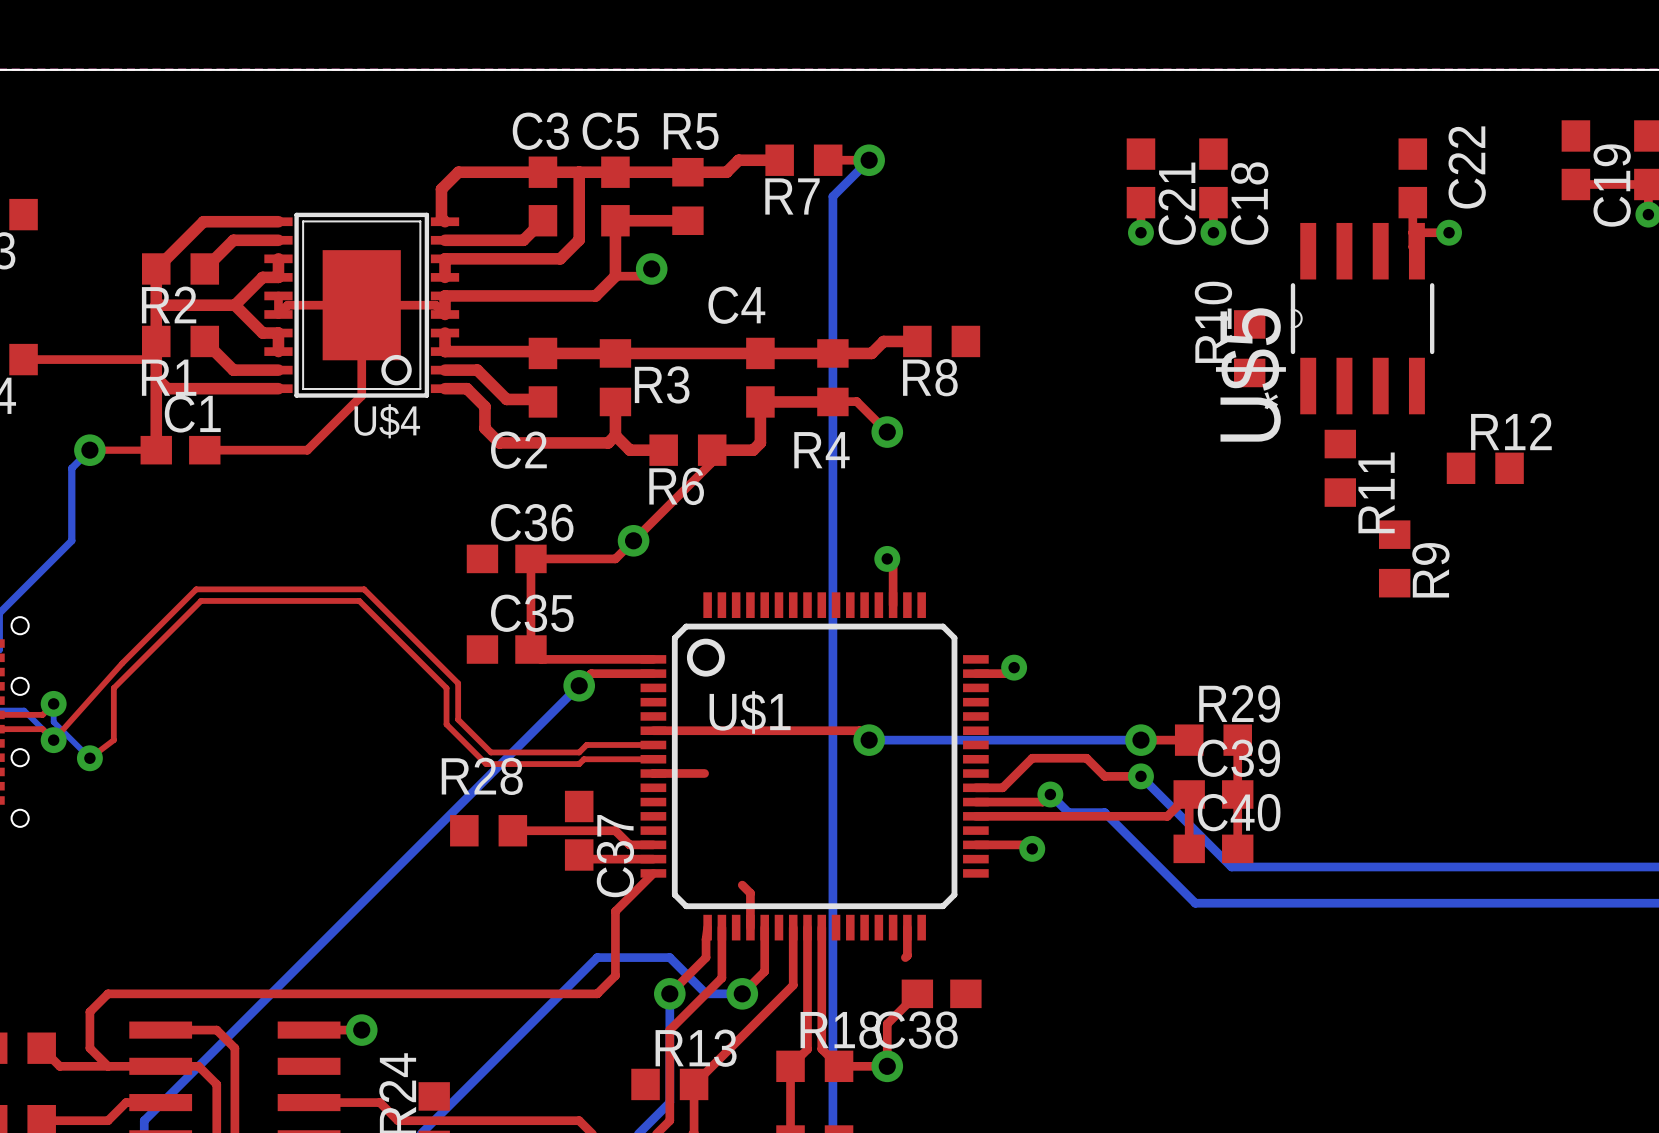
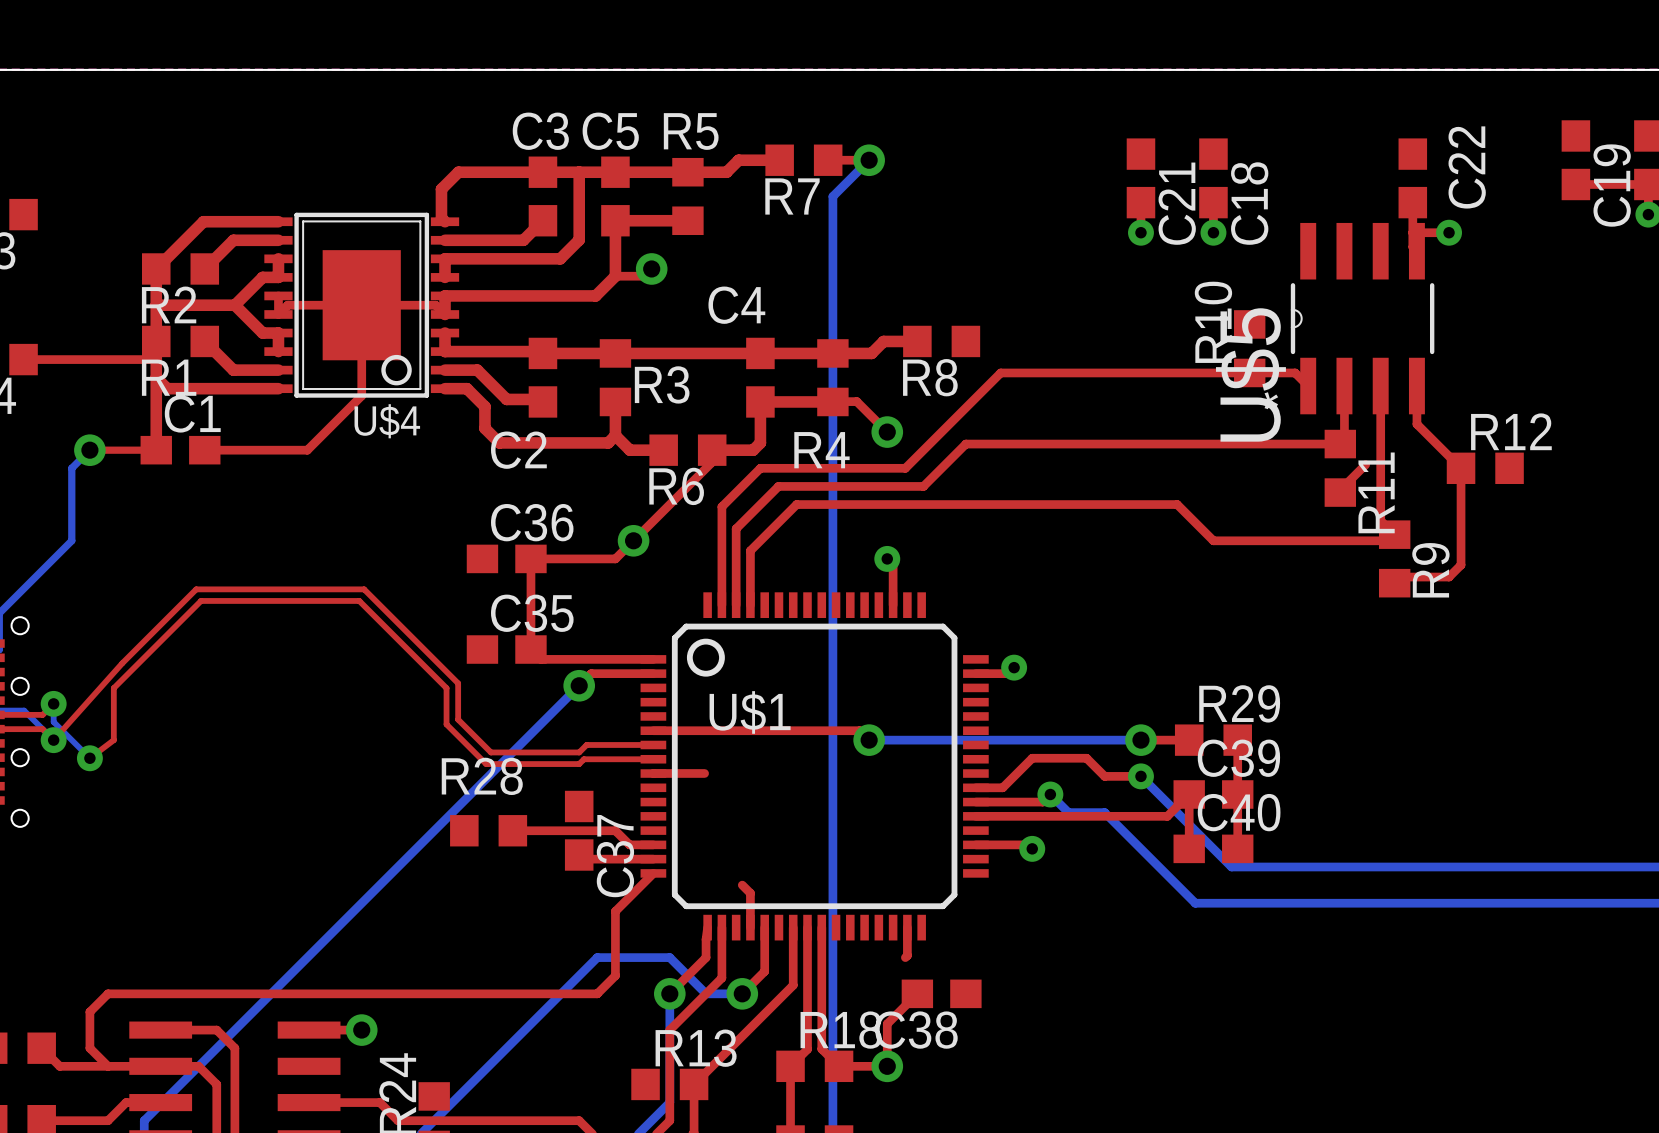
top track: none -> (1308, 386) (1295, 372) (1000, 372) (905, 468) (760, 468) (721, 506) (721, 605)
top track: none -> (1344, 386) (1344, 439) (1340, 444) (965, 444) (923, 486) (778, 486) (736, 528) (736, 605)
top track: none -> (1380, 386) (1380, 520) (1394, 534) (1388, 540) (1213, 540) (1177, 504) (796, 504) (750, 550) (750, 605)
top track: none -> (1416, 386) (1416, 424) (1461, 468) (1461, 565) (1449, 577) (1400, 577) (1394, 583)
top track: none -> (1365, 464) (1340, 490) (1340, 492)

